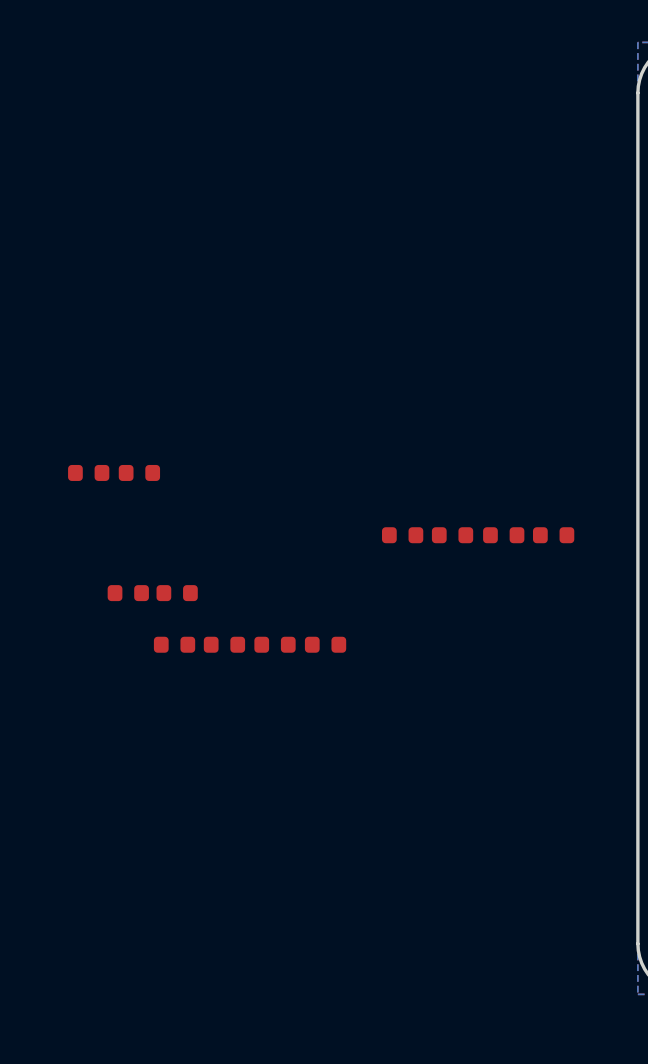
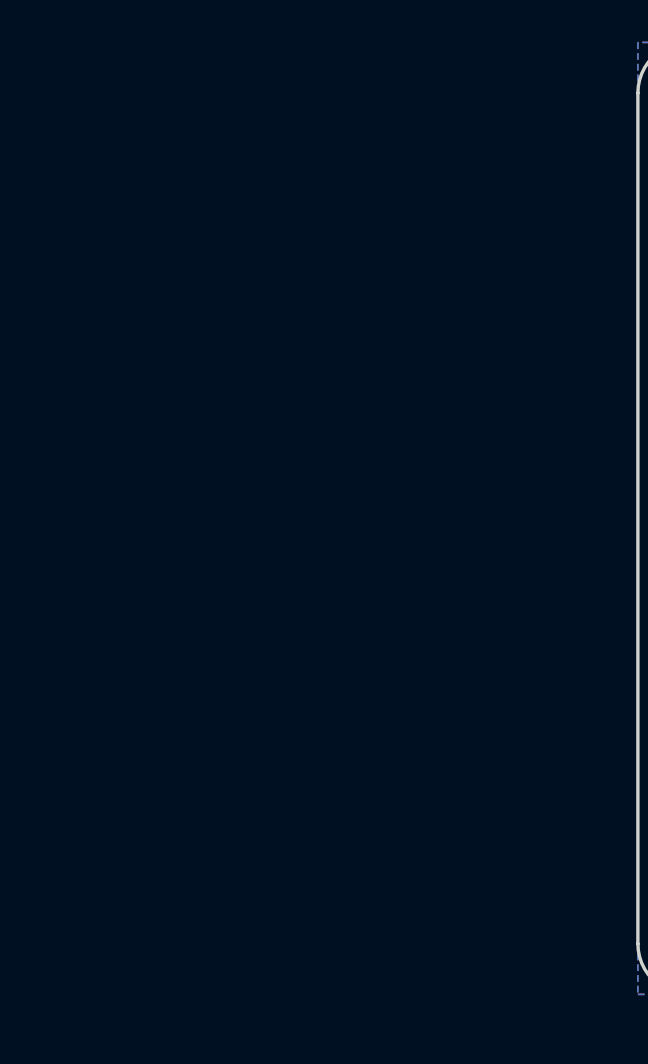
part: (88, 472) -> none
part: (139, 472) -> none
part: (402, 535) -> none
part: (452, 535) -> none
part: (503, 535) -> none
part: (553, 535) -> none
part: (128, 593) -> none
part: (177, 593) -> none
part: (174, 644) -> none
part: (224, 644) -> none
part: (275, 644) -> none
part: (325, 644) -> none

